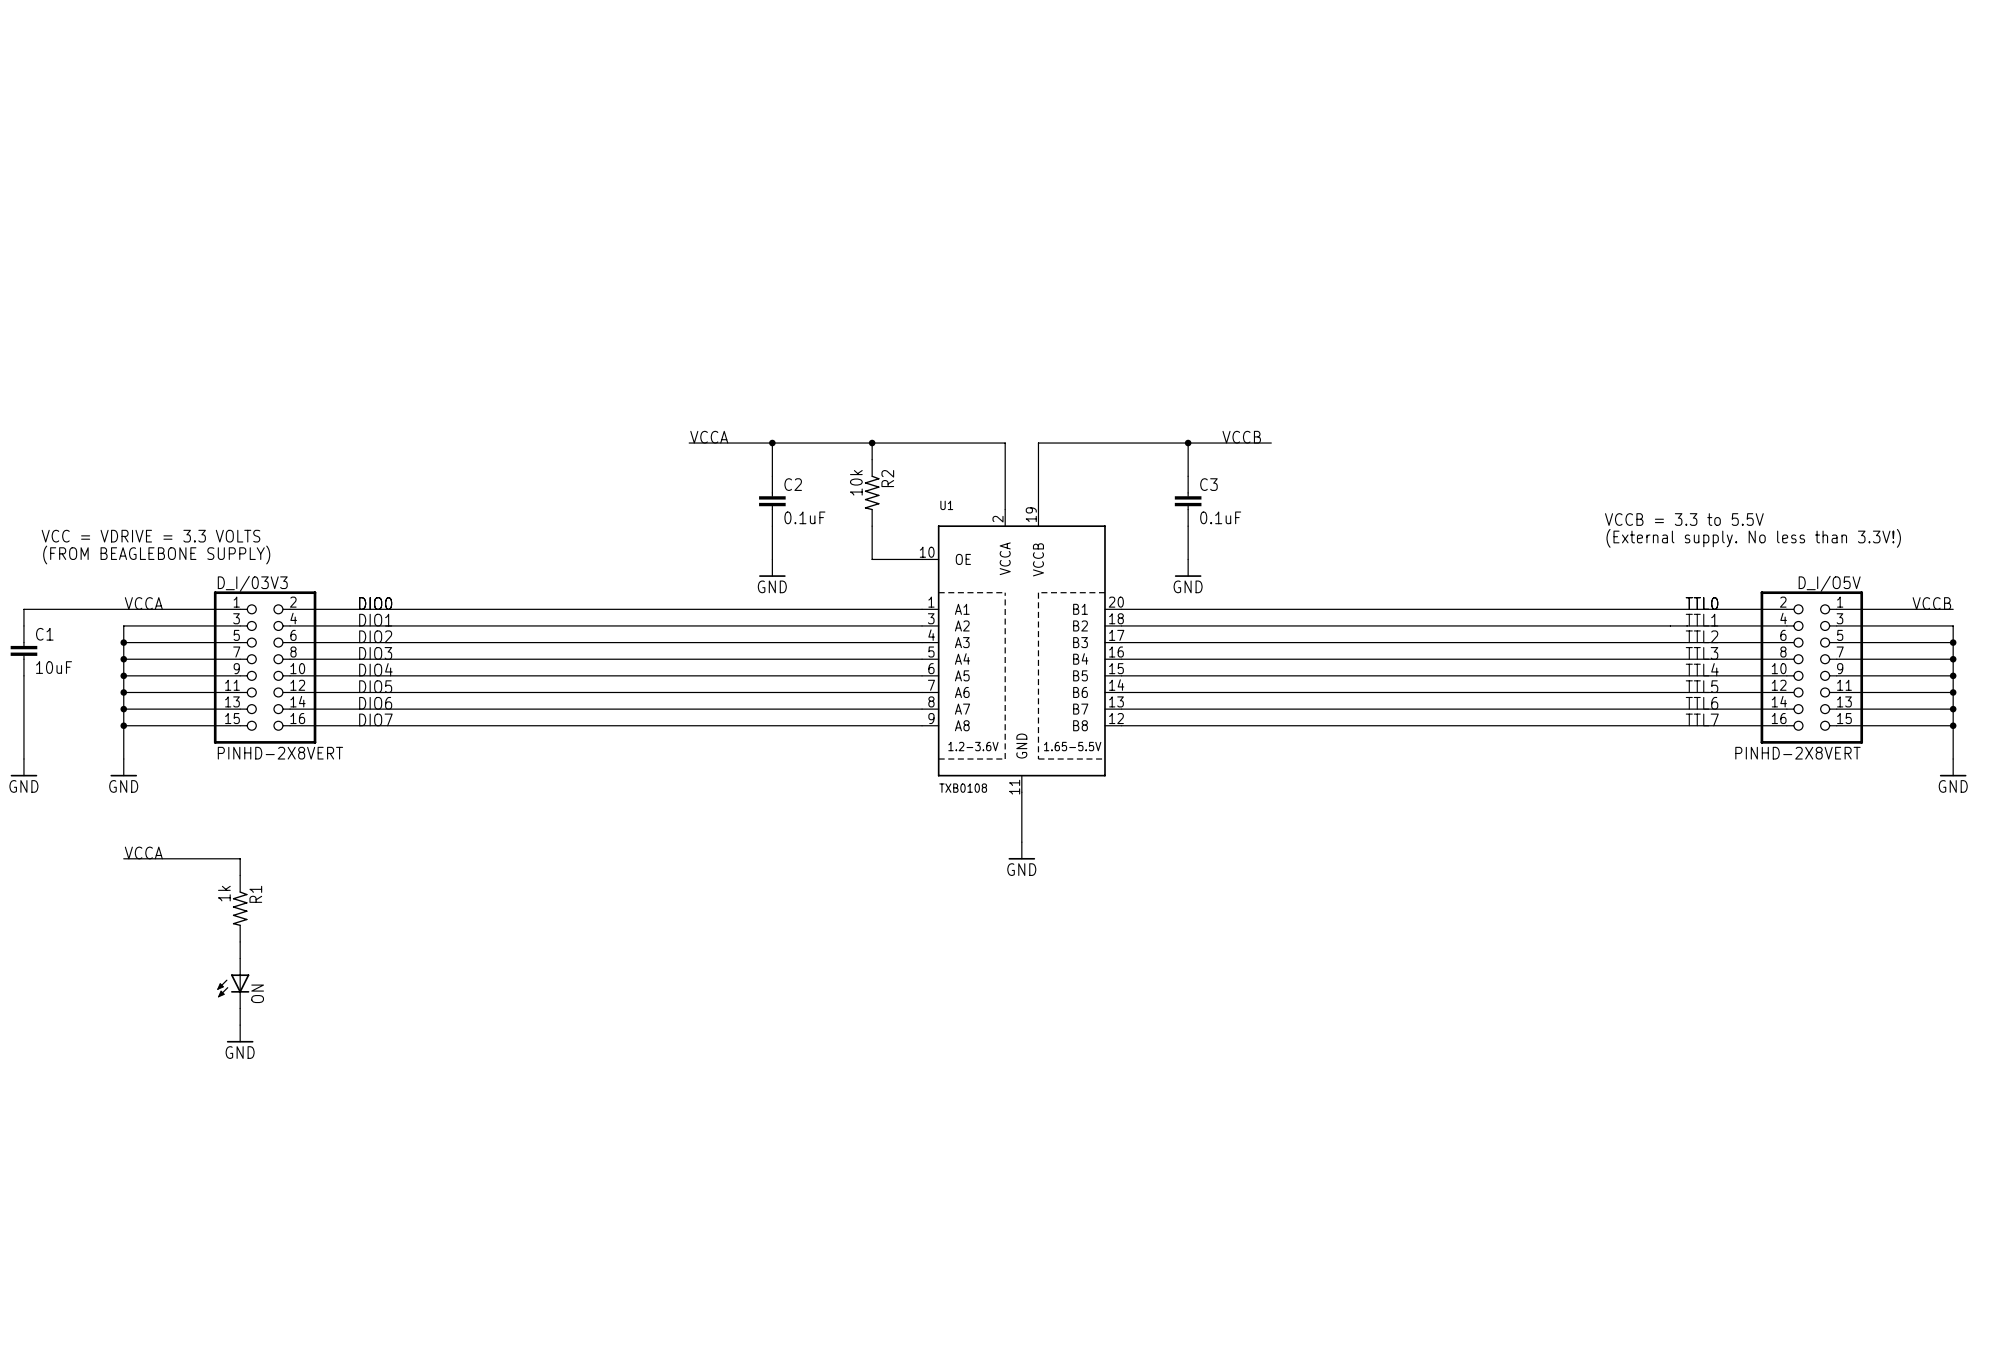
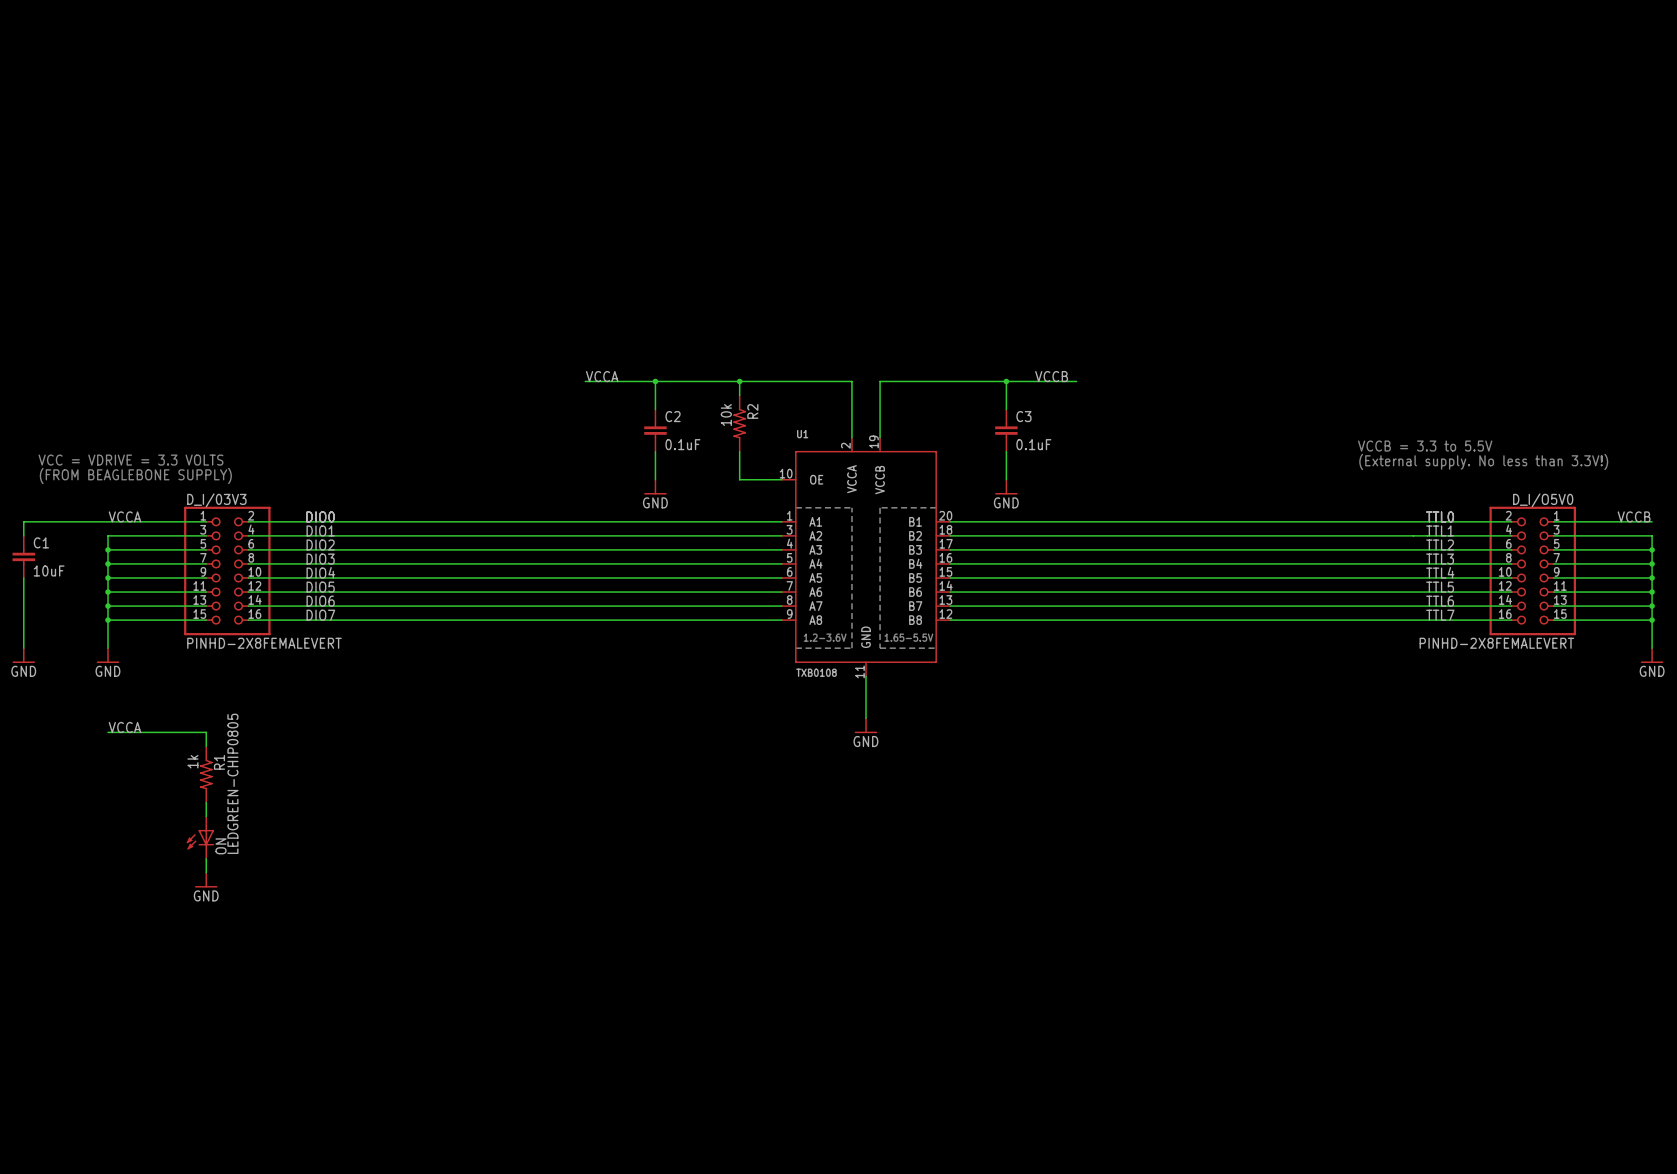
D_I/O5V name: D_I/O5V (1829, 583) -> D_I/O5V0 (1543, 500)
D_I/03V3 value: PINHD-2X8VERT (280, 753) -> PINHD-2X8FEMALEVERT (264, 643)
D_I/O5V value: PINHD-2X8VERT (1797, 753) -> PINHD-2X8FEMALEVERT (1496, 643)
ON value: none -> LEDGREEN-CHIP0805 (232, 783)

